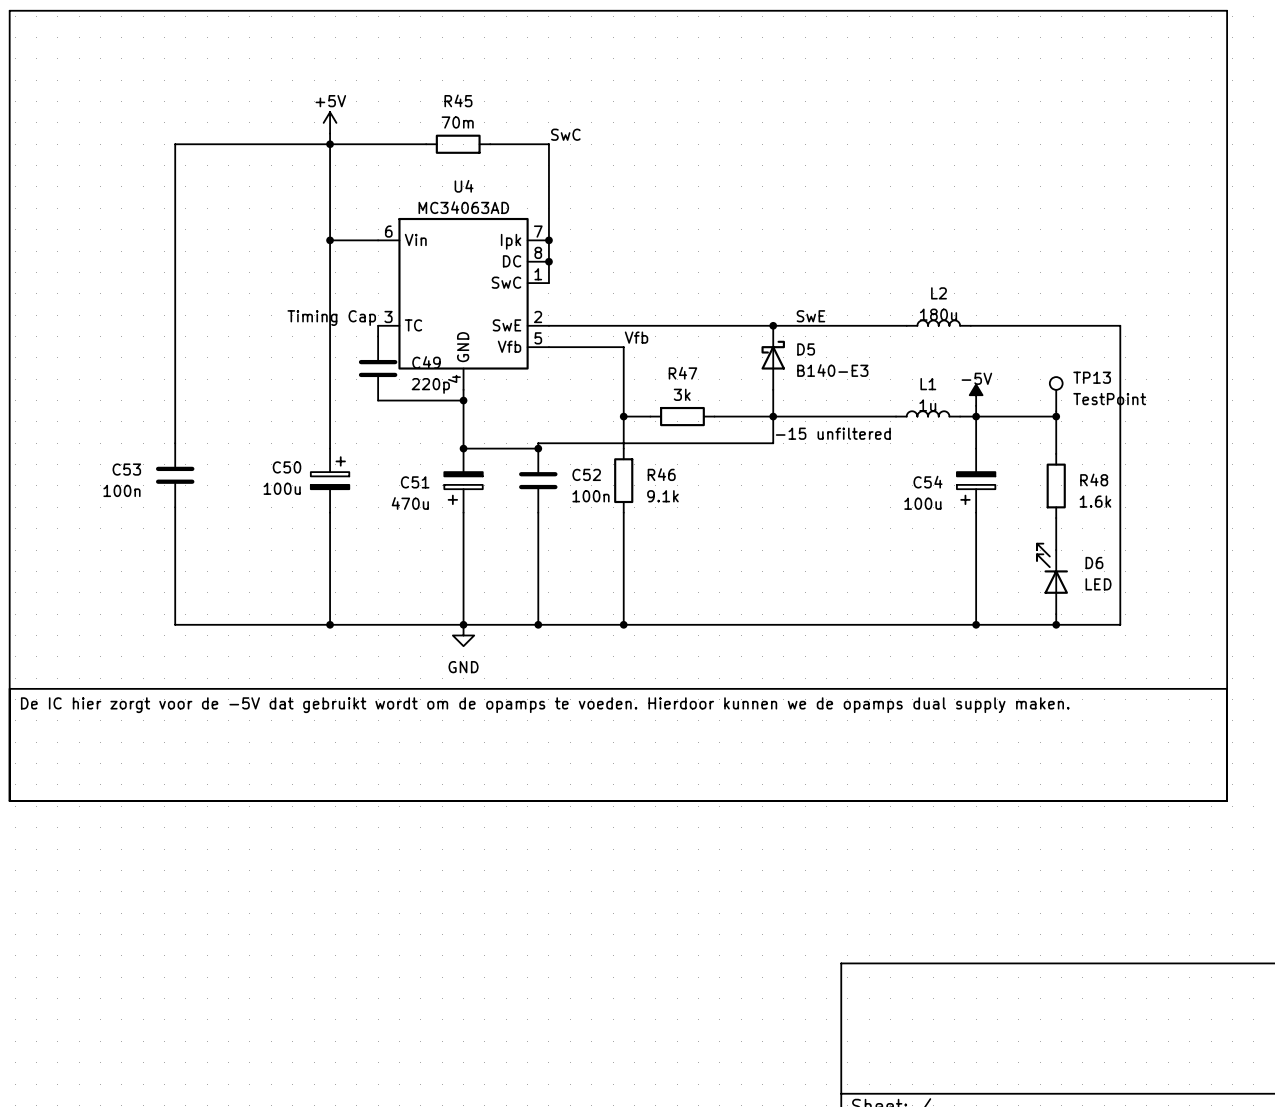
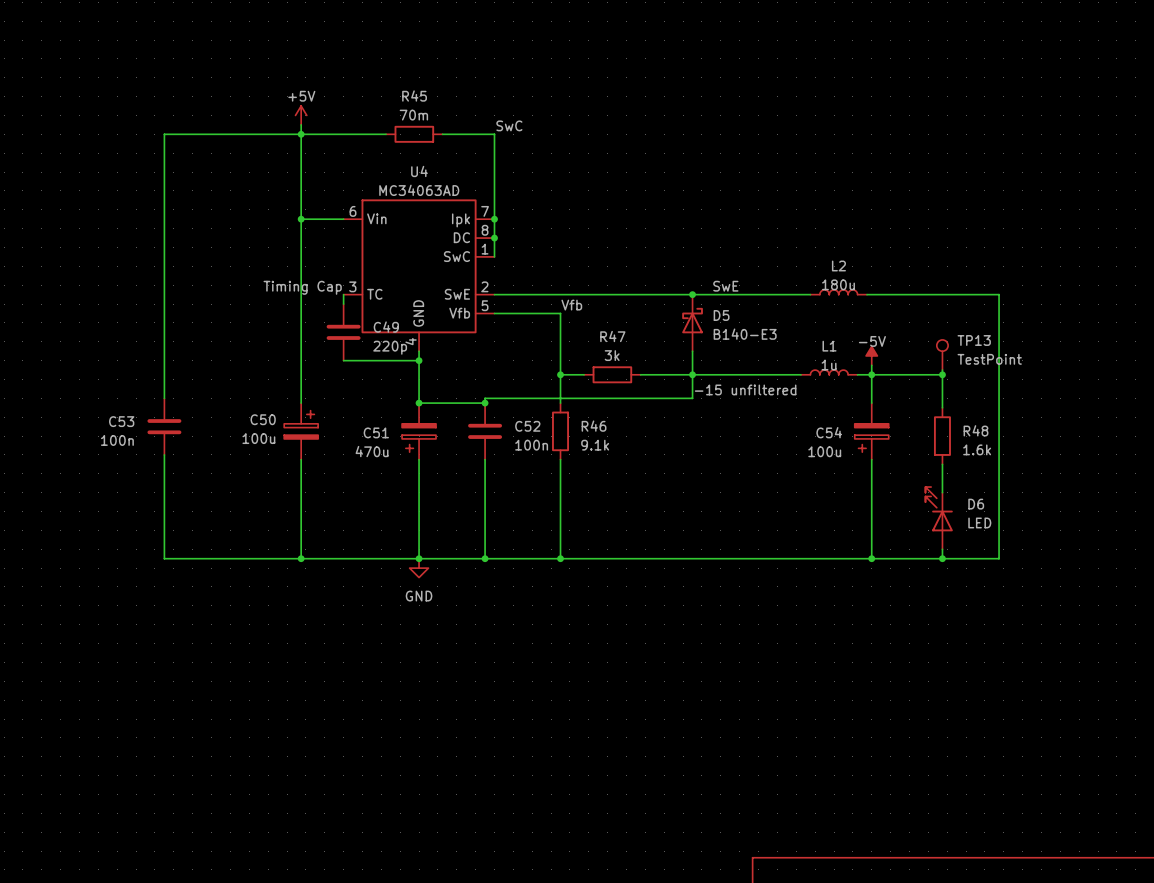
line: (1227, 688) (9, 688) (9, 801) -> none
text: De IC hier zorgt voor de -5V dat gebruikt wordt om de opamps te voeden. Hierdoor kunnen we de opamps dual supply maken. (545, 705) -> none
line: (9, 801) (1227, 801) (1227, 10) (9, 10) (9, 801) -> none

